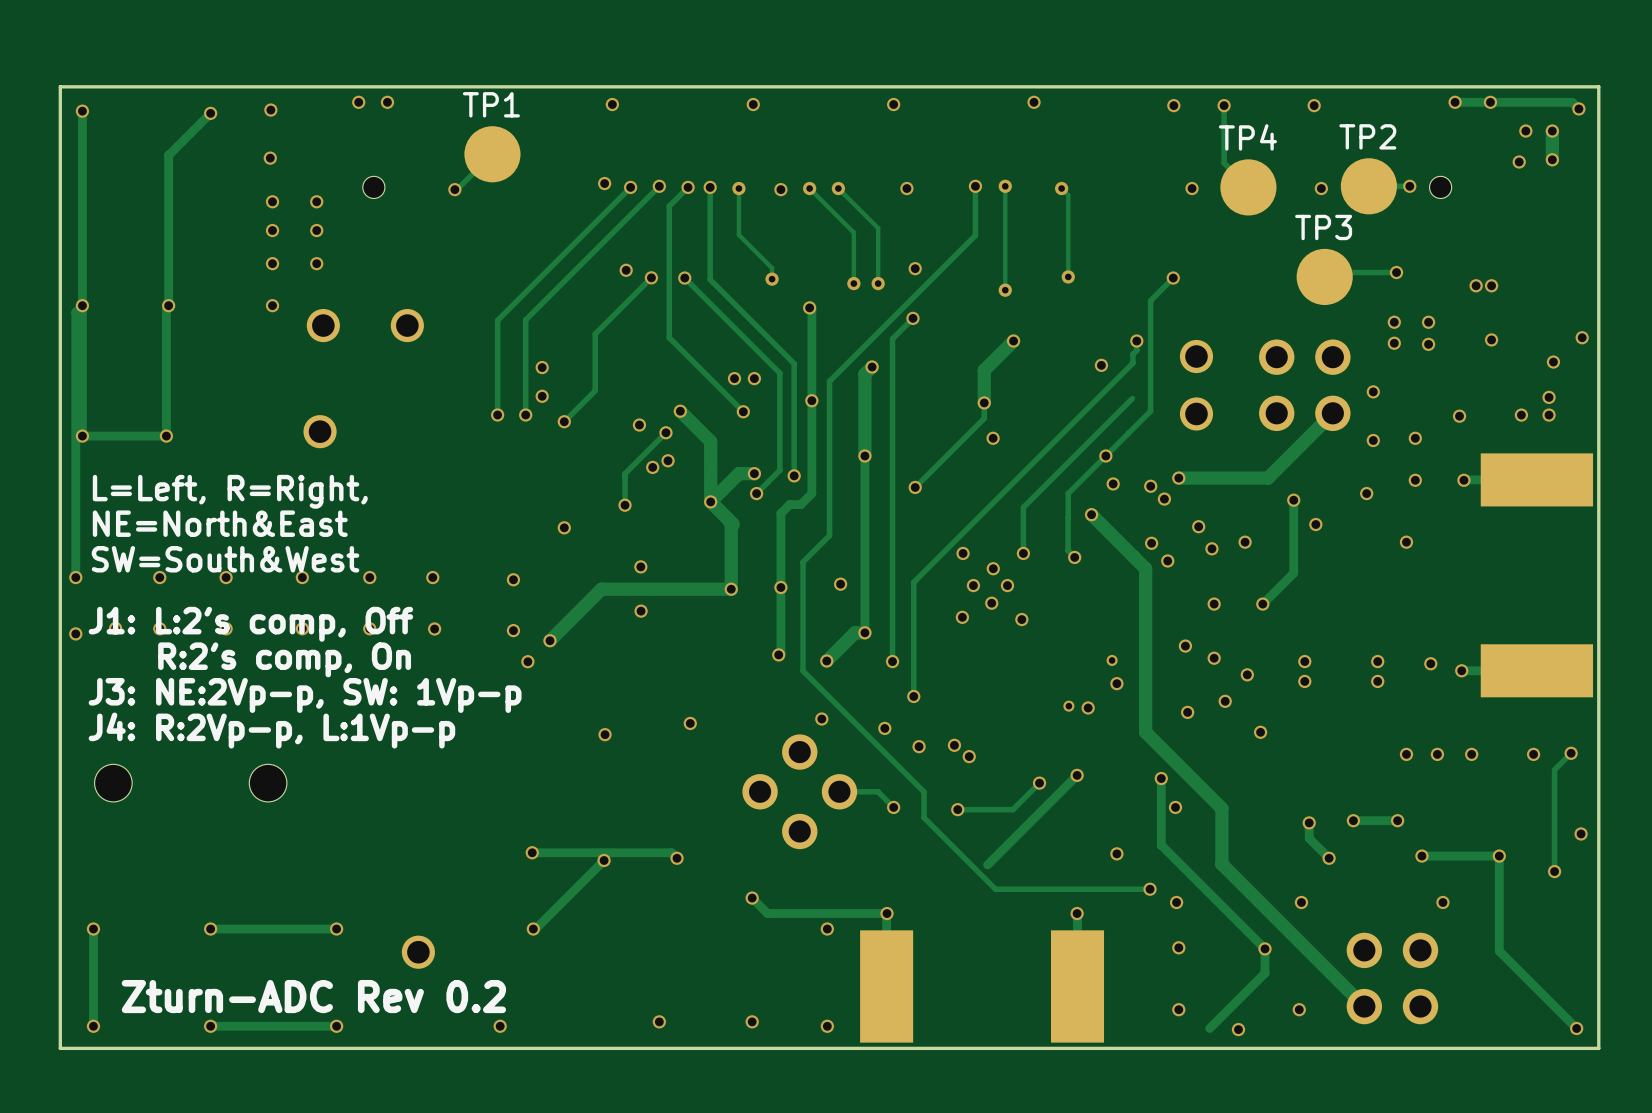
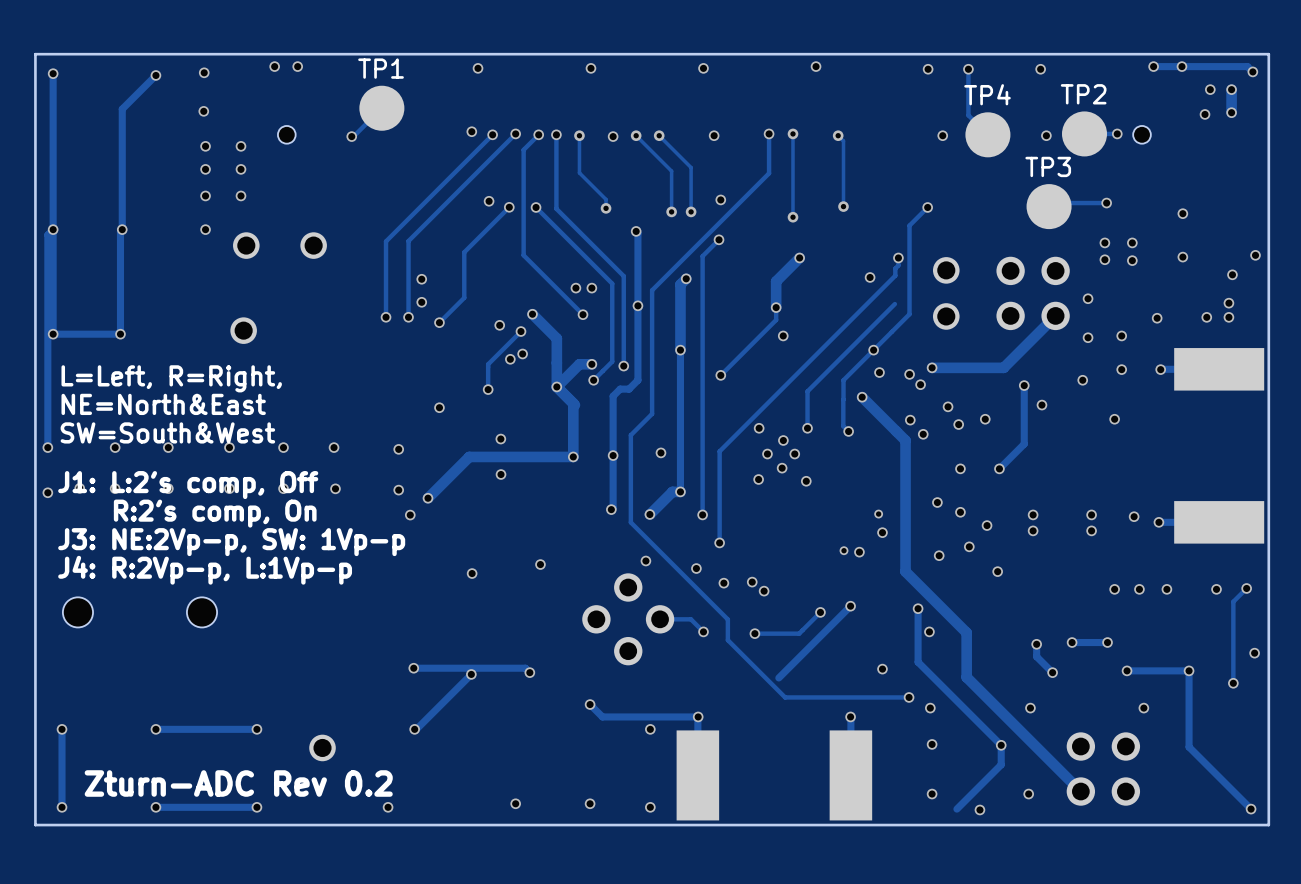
via: (1476, 285) -> none

